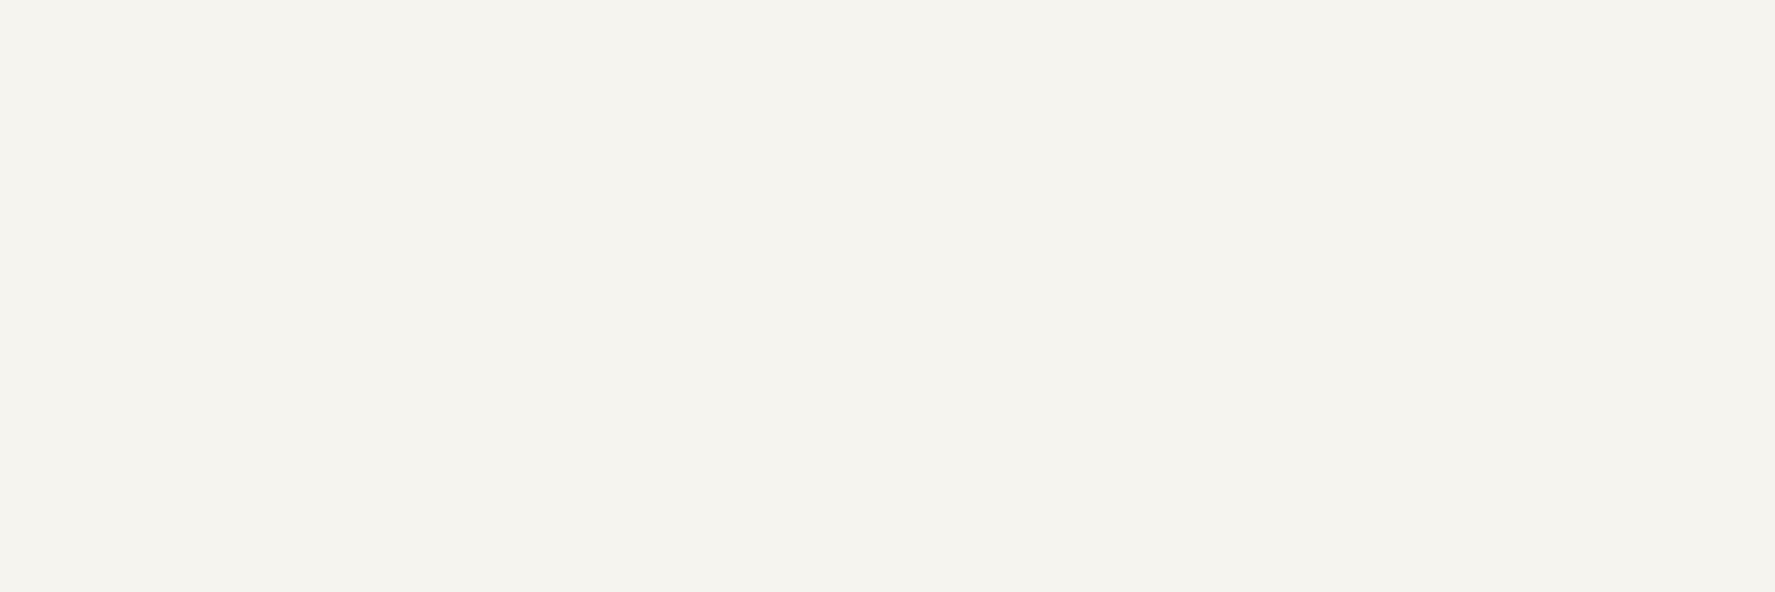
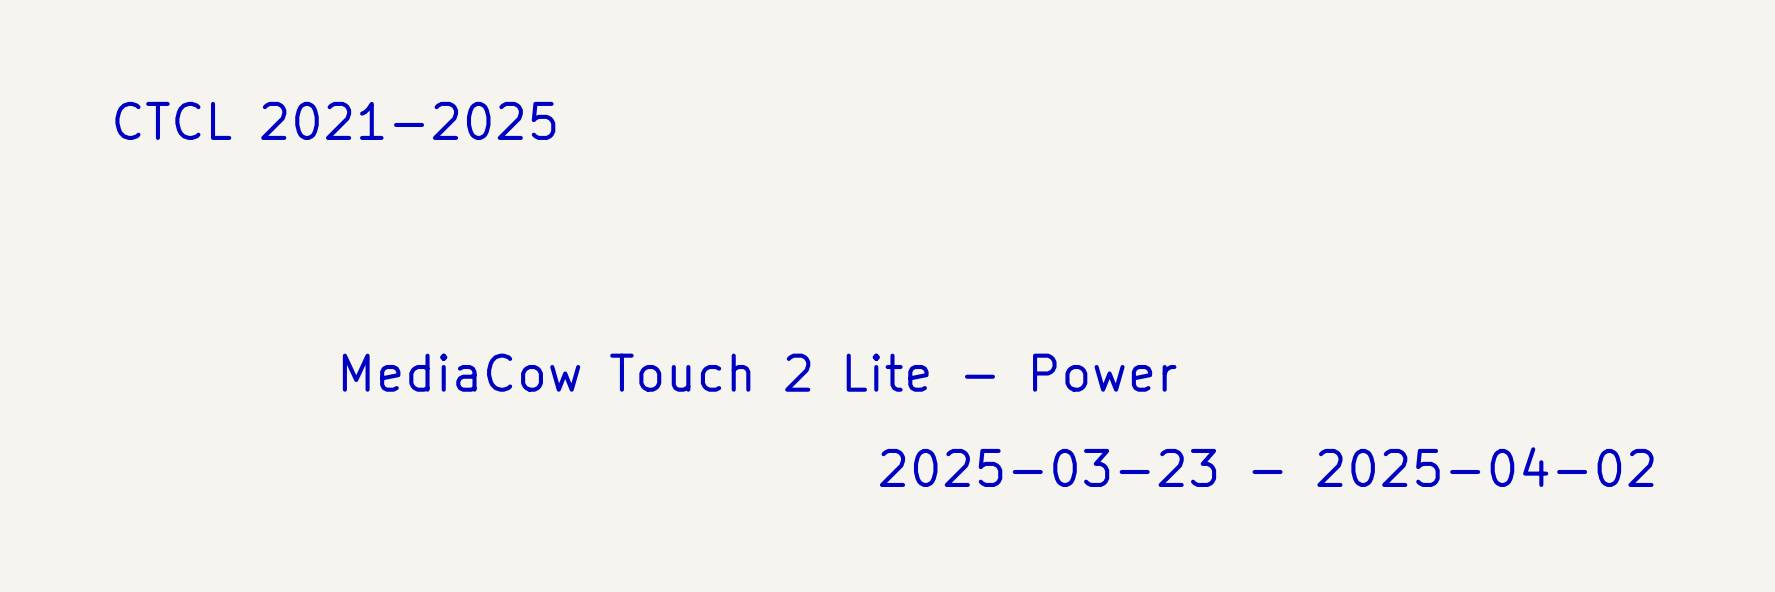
text: none -> CTCL 2021-2025 (335, 120)
text: none -> MediaCow Touch 2 Lite - Power (759, 372)
text: none -> 2025-03-23 - 2025-04-02 (1266, 467)

